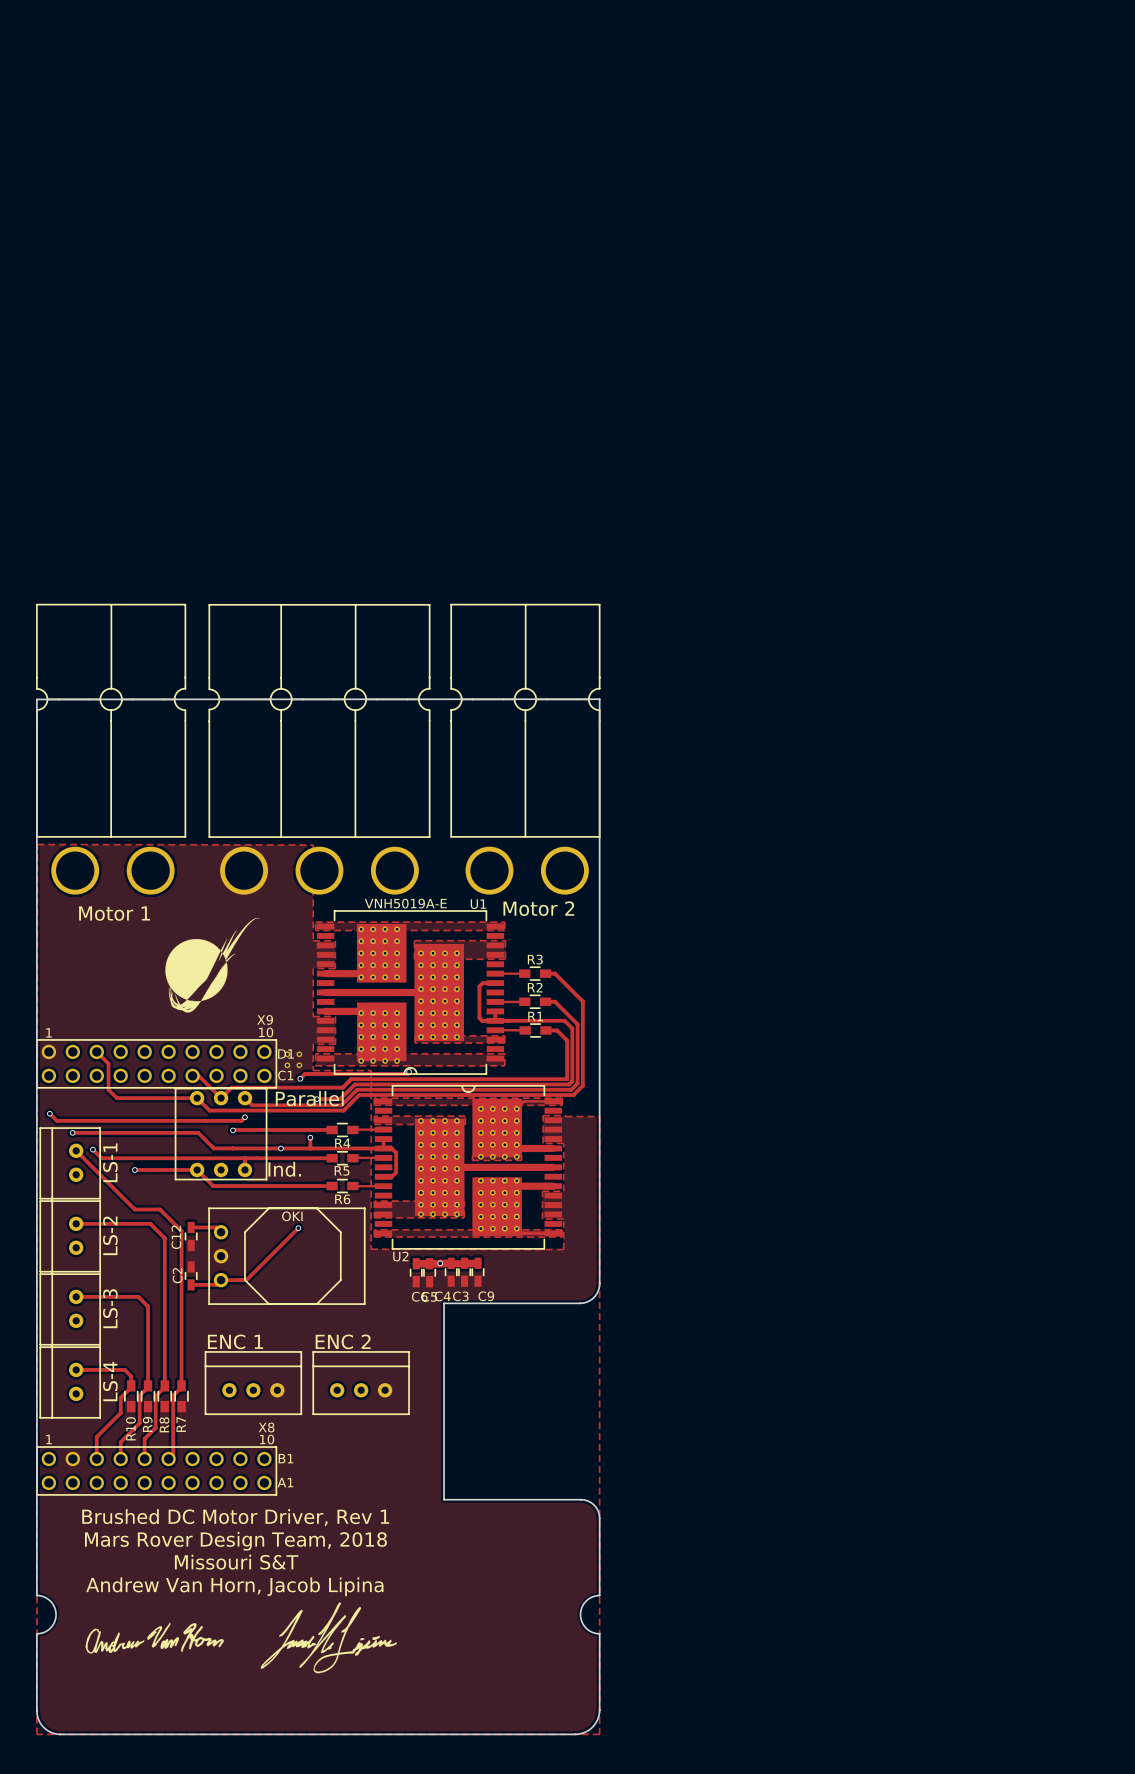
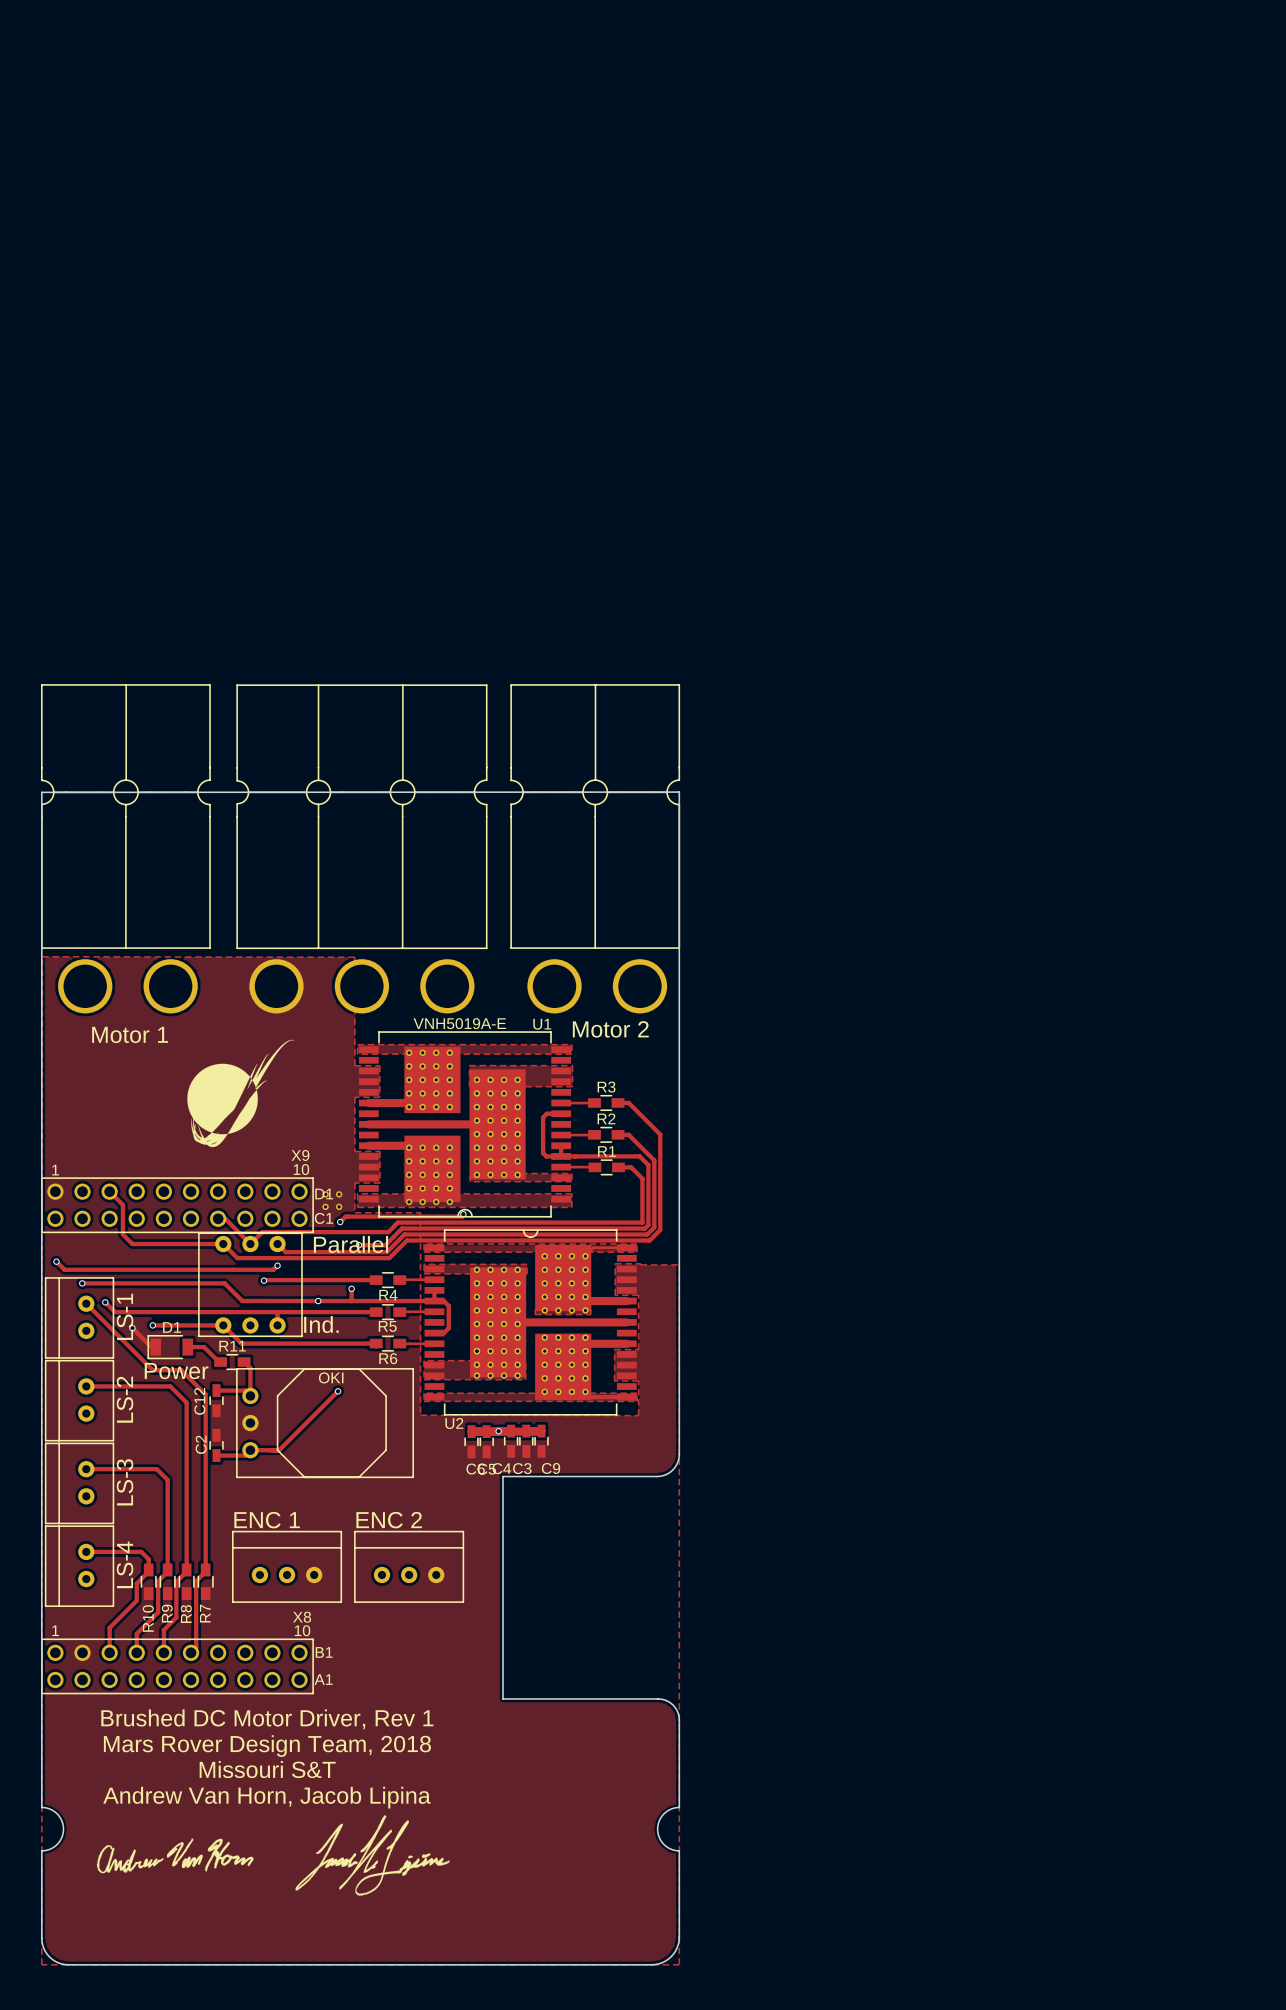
track: none -> (132, 1328) (151, 1347) (155, 1347)
via: none -> (132, 1328)
D1: none -> (170, 1347)
track: none -> (187, 1347) (204, 1347) (220, 1362)
R11: none -> (232, 1362)
track: none -> (244, 1362) (250, 1368) (250, 1395)
text: none -> Power (176, 1371)

